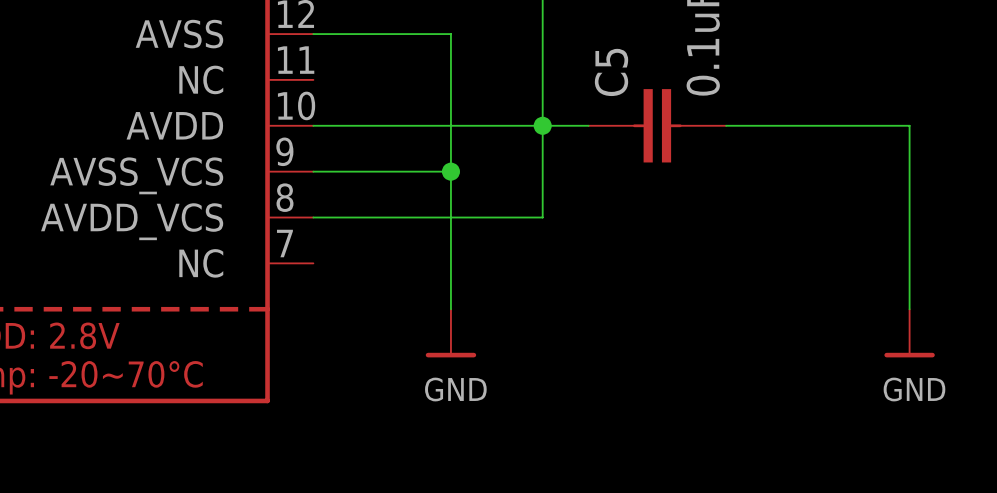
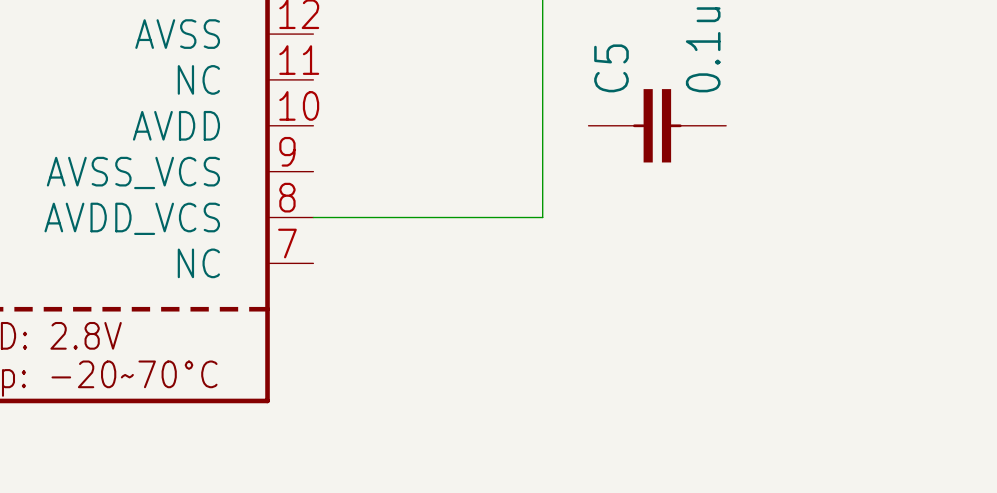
wire: (313, 34) (450, 34) (450, 309) -> none
wire: (313, 125) (588, 125) -> none
junction: (542, 125) -> none
wire: (726, 125) (909, 125) (909, 309) -> none
wire: (313, 171) (450, 171) -> none
junction: (450, 171) -> none
power symbol: GND (450, 333) -> none
power symbol: GND (909, 333) -> none

